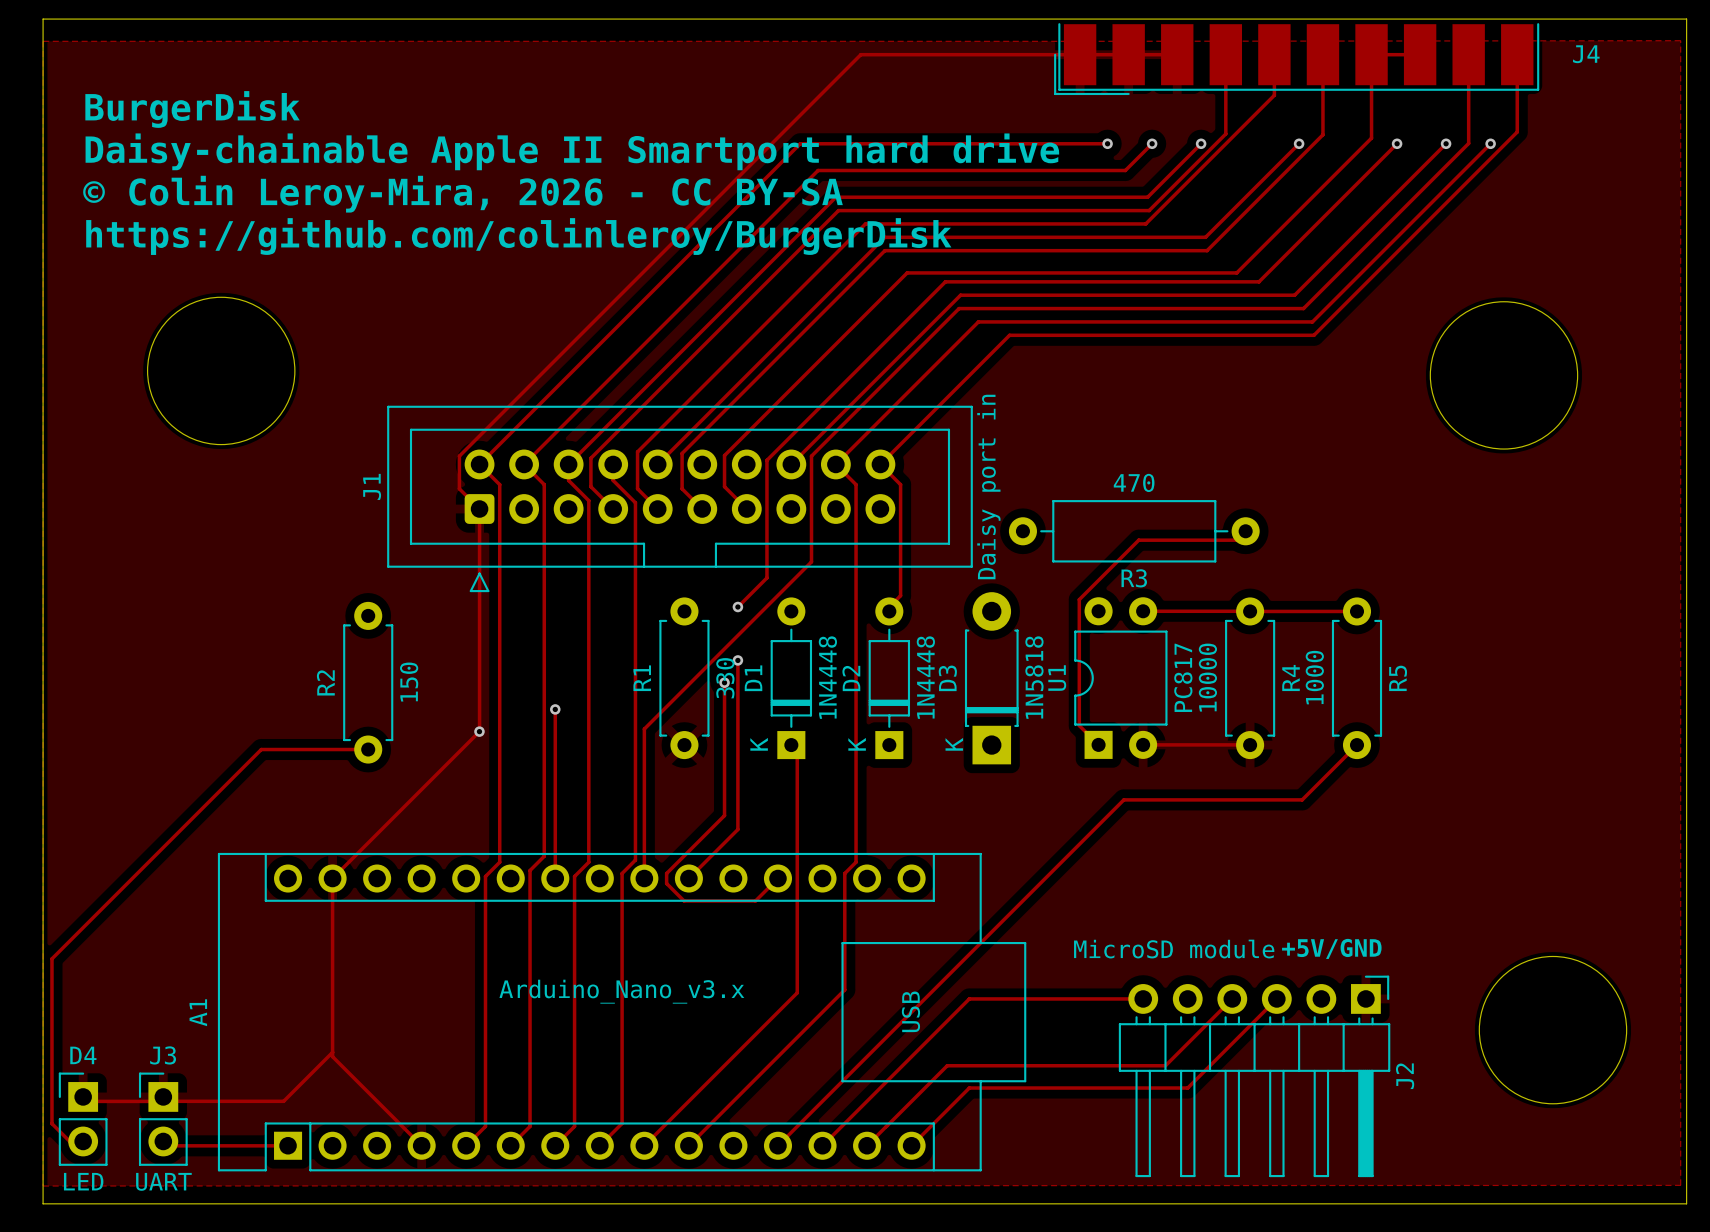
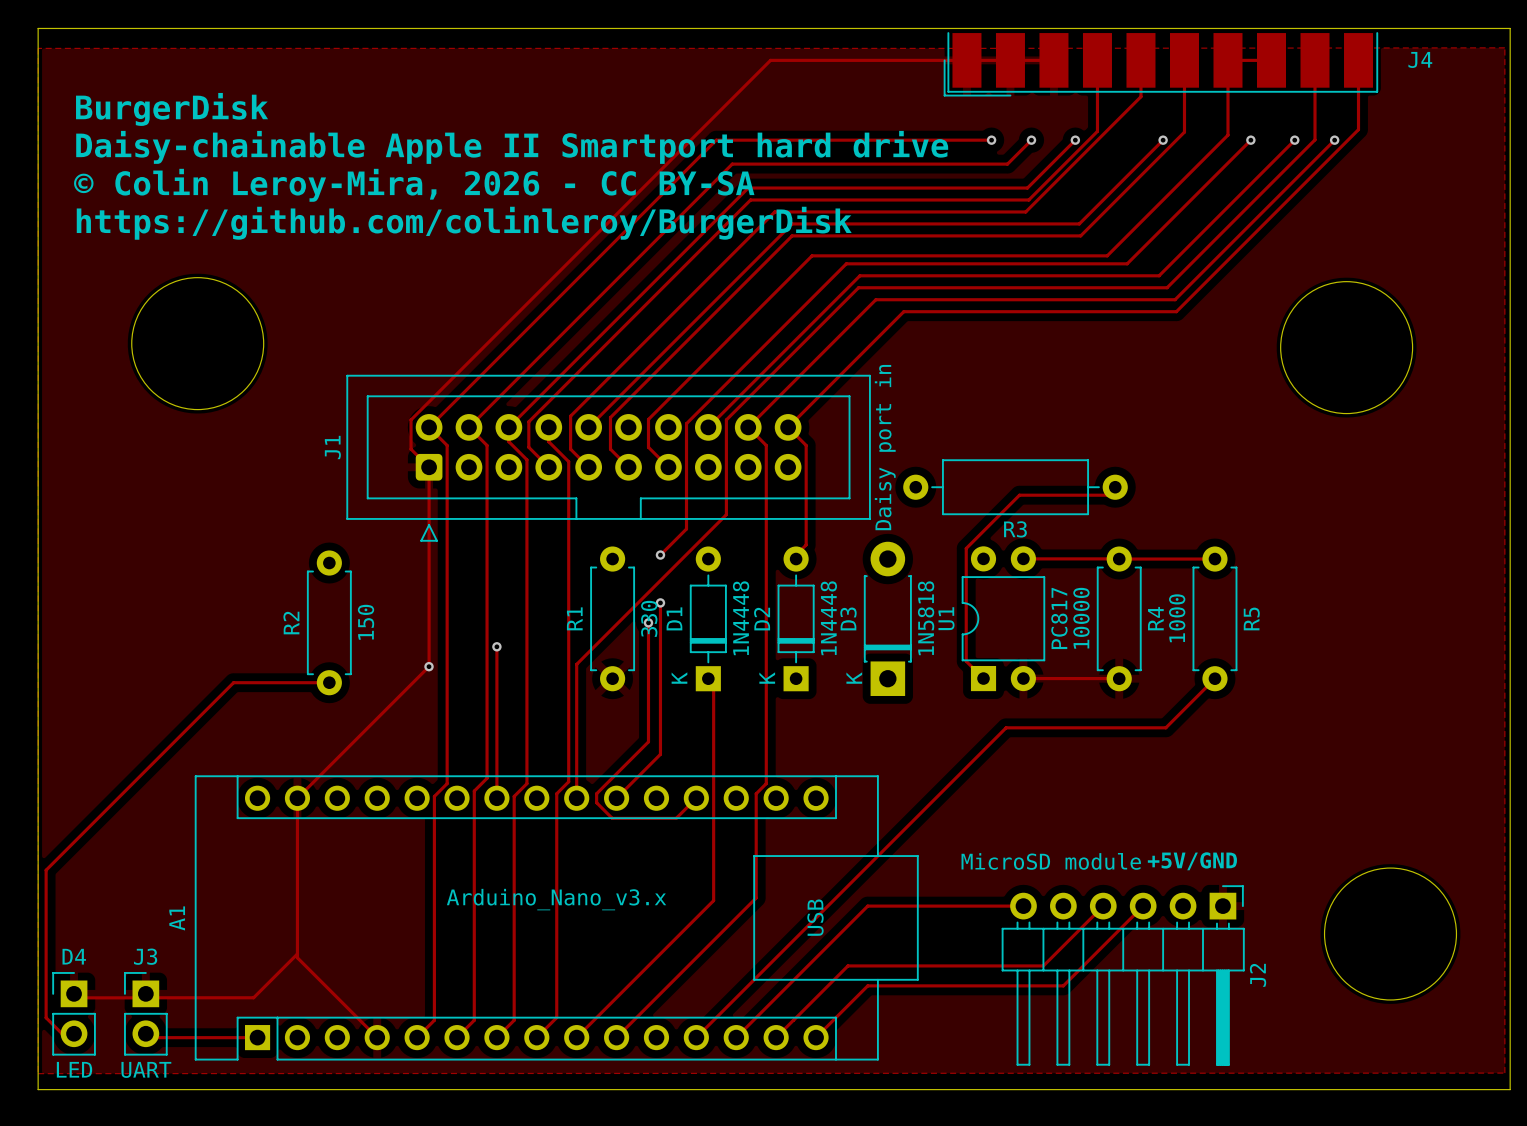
R3 value: 470 (1134, 482) -> none

